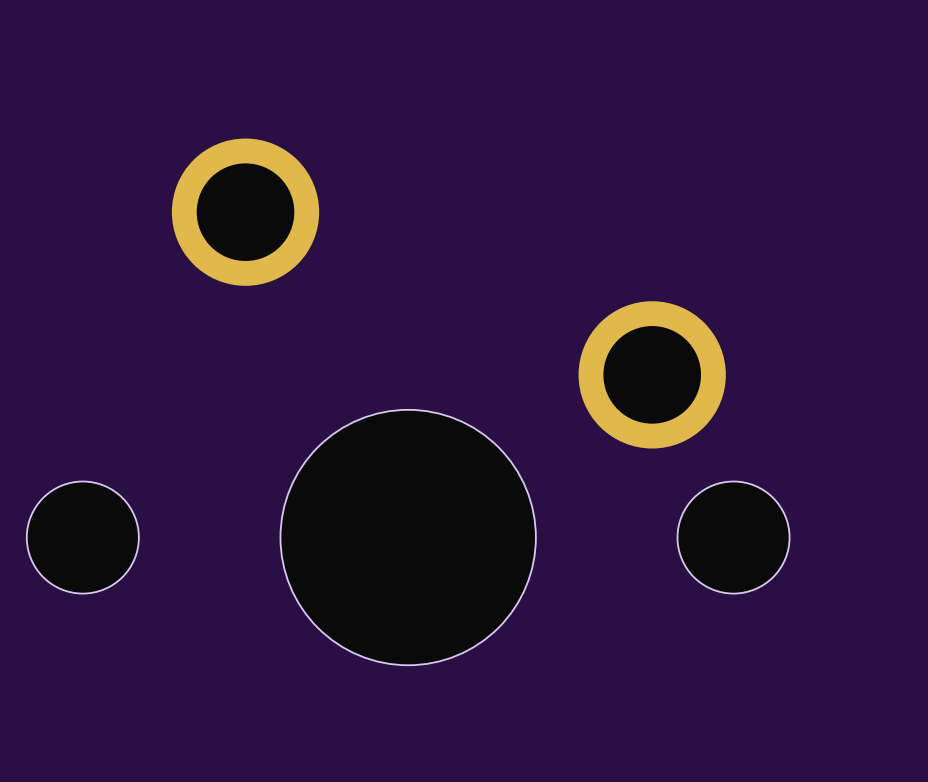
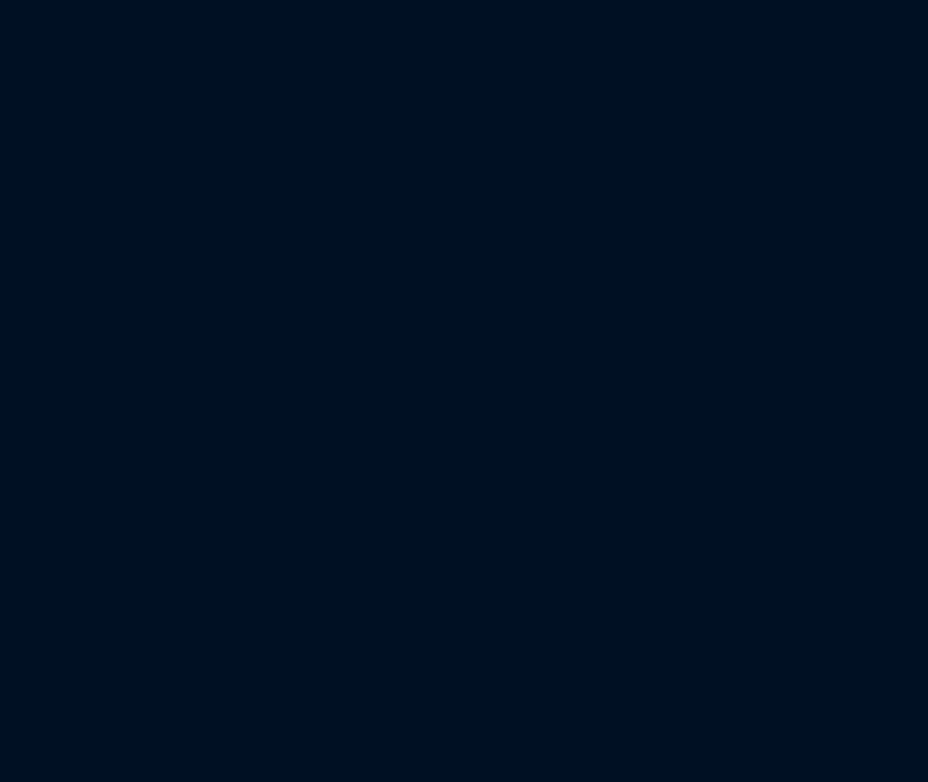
part: (408, 401) -> none

